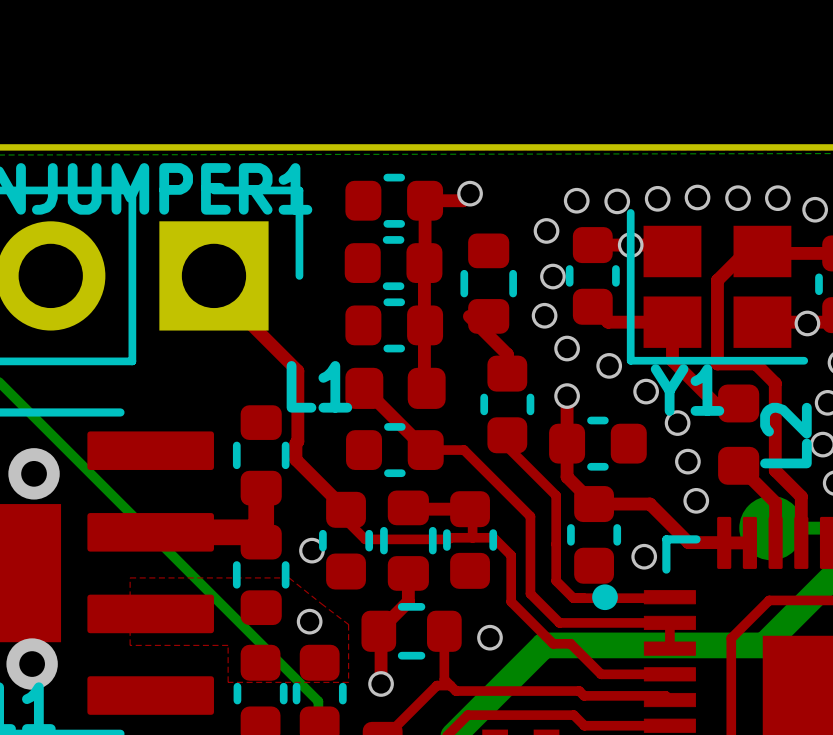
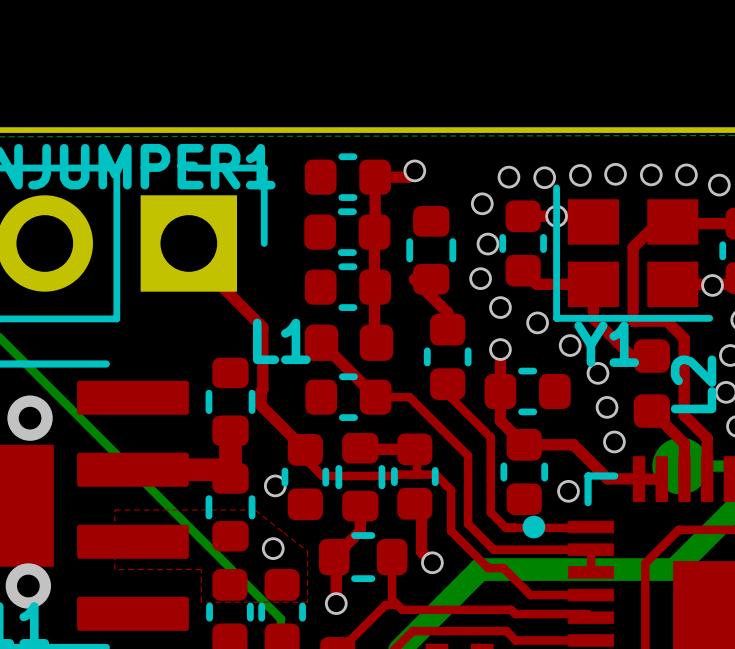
top track: none -> (421, 510) (421, 551) (432, 562)

